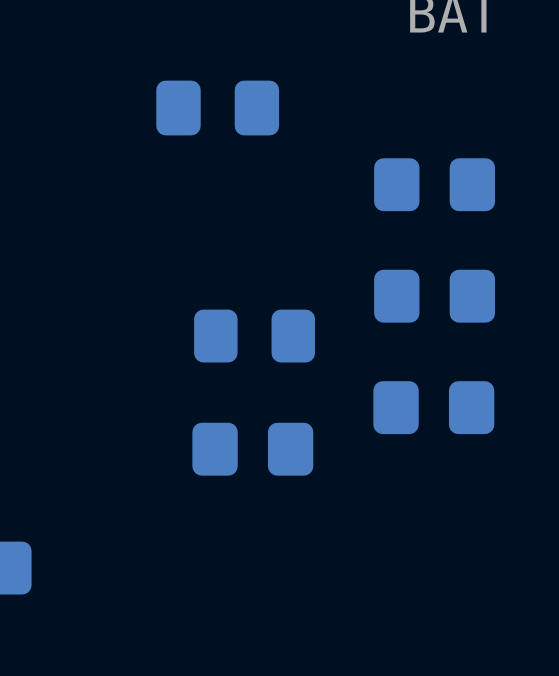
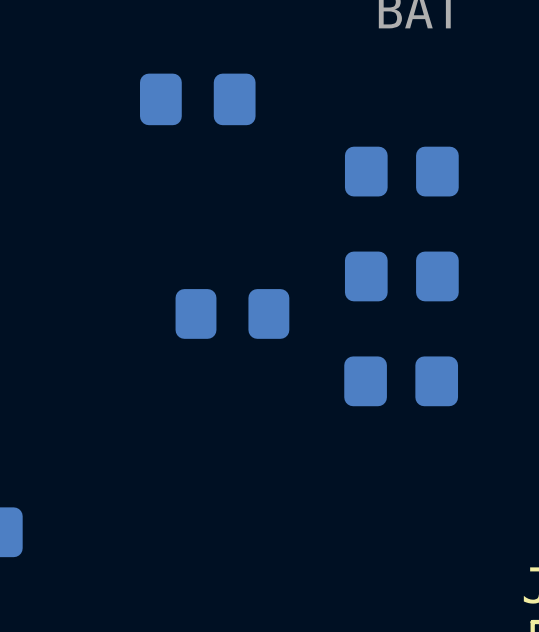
part: (252, 449) -> none

